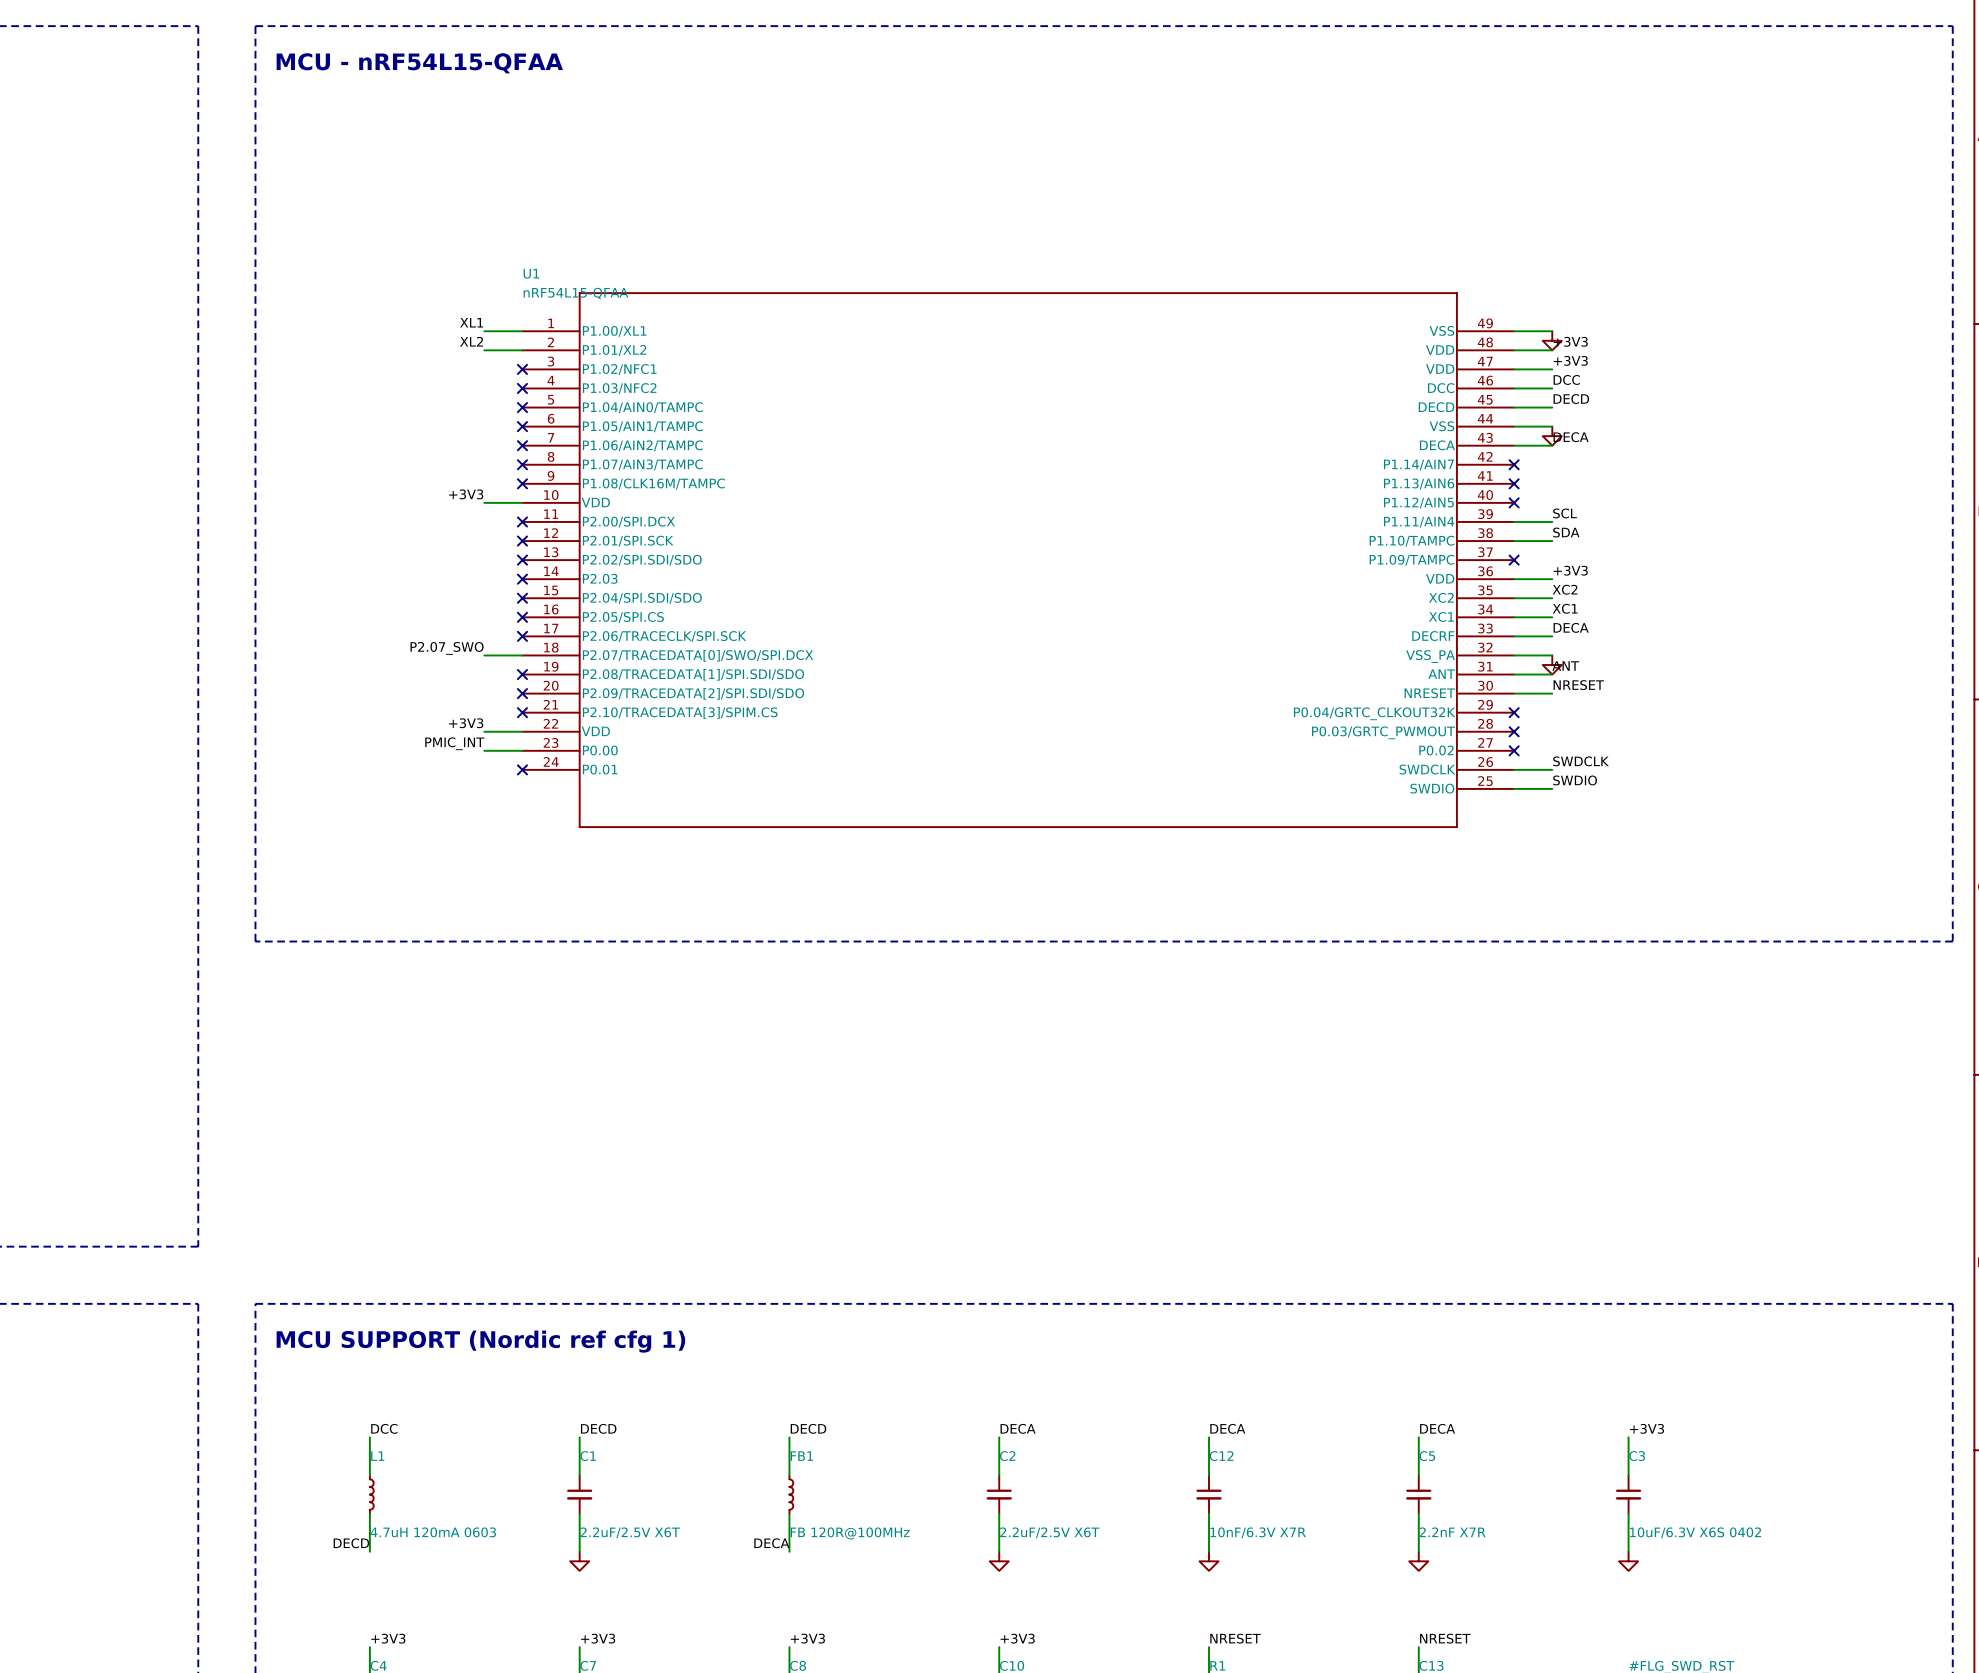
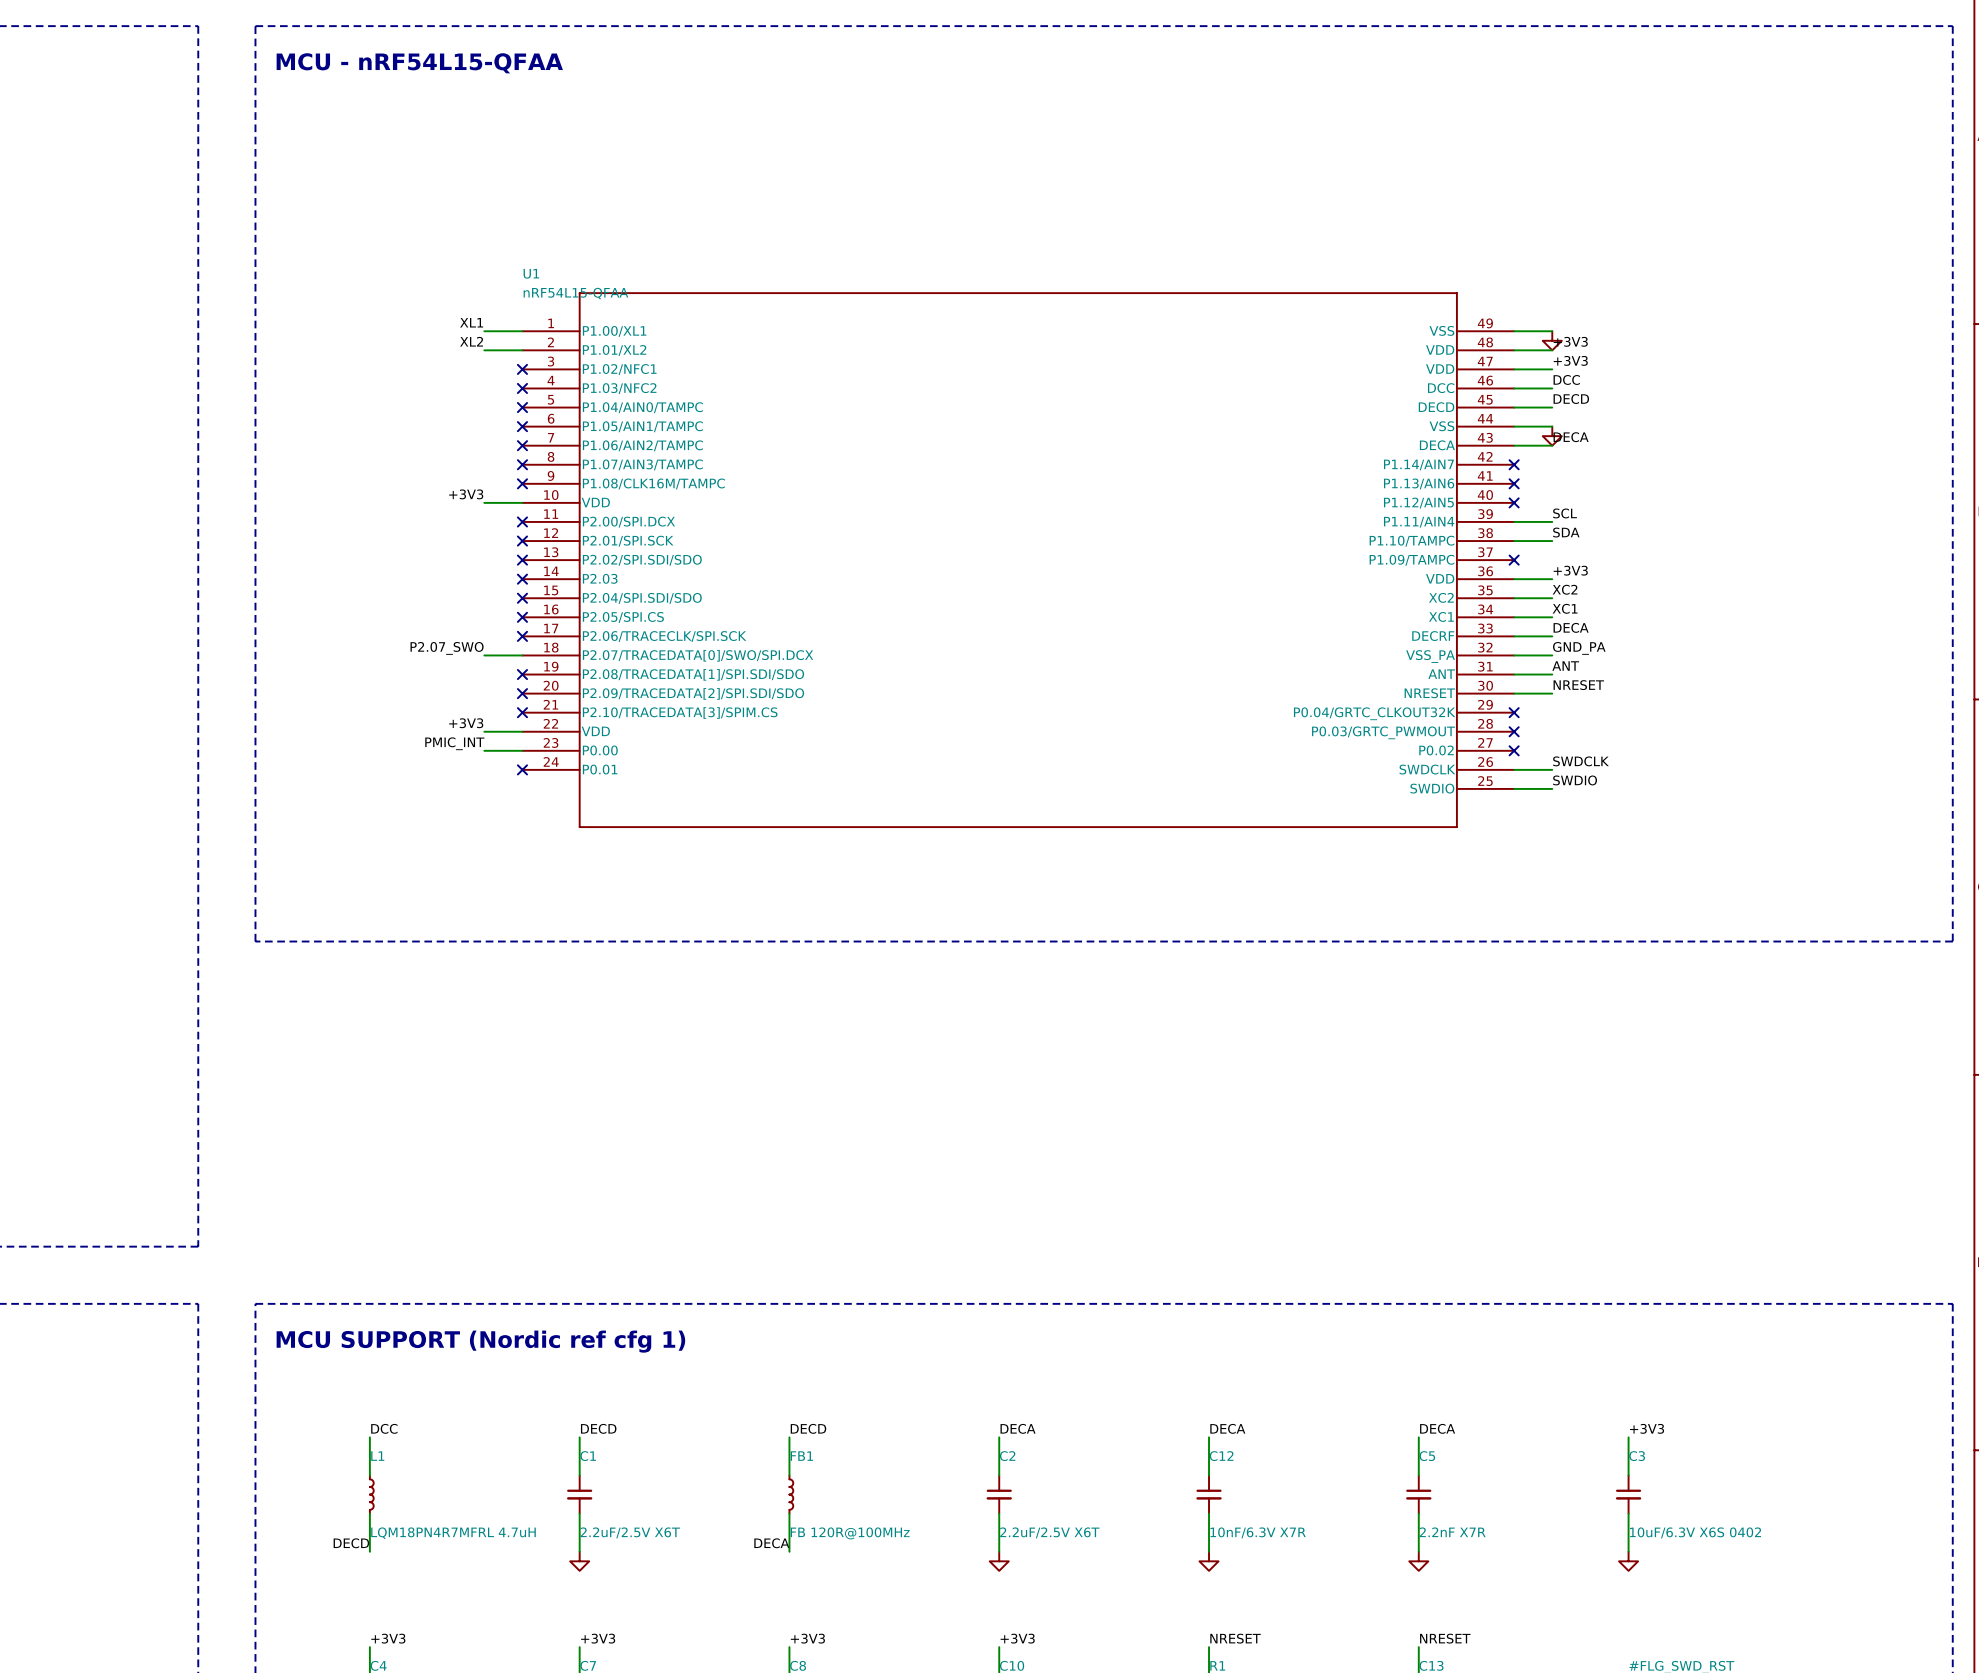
label: none -> GND_PA (1579, 648)
power symbol: (1552, 665) -> none
L1 value: 4.7uH 120mA 0603 (433, 1532) -> LQM18PN4R7MFRL 4.7uH (453, 1533)

